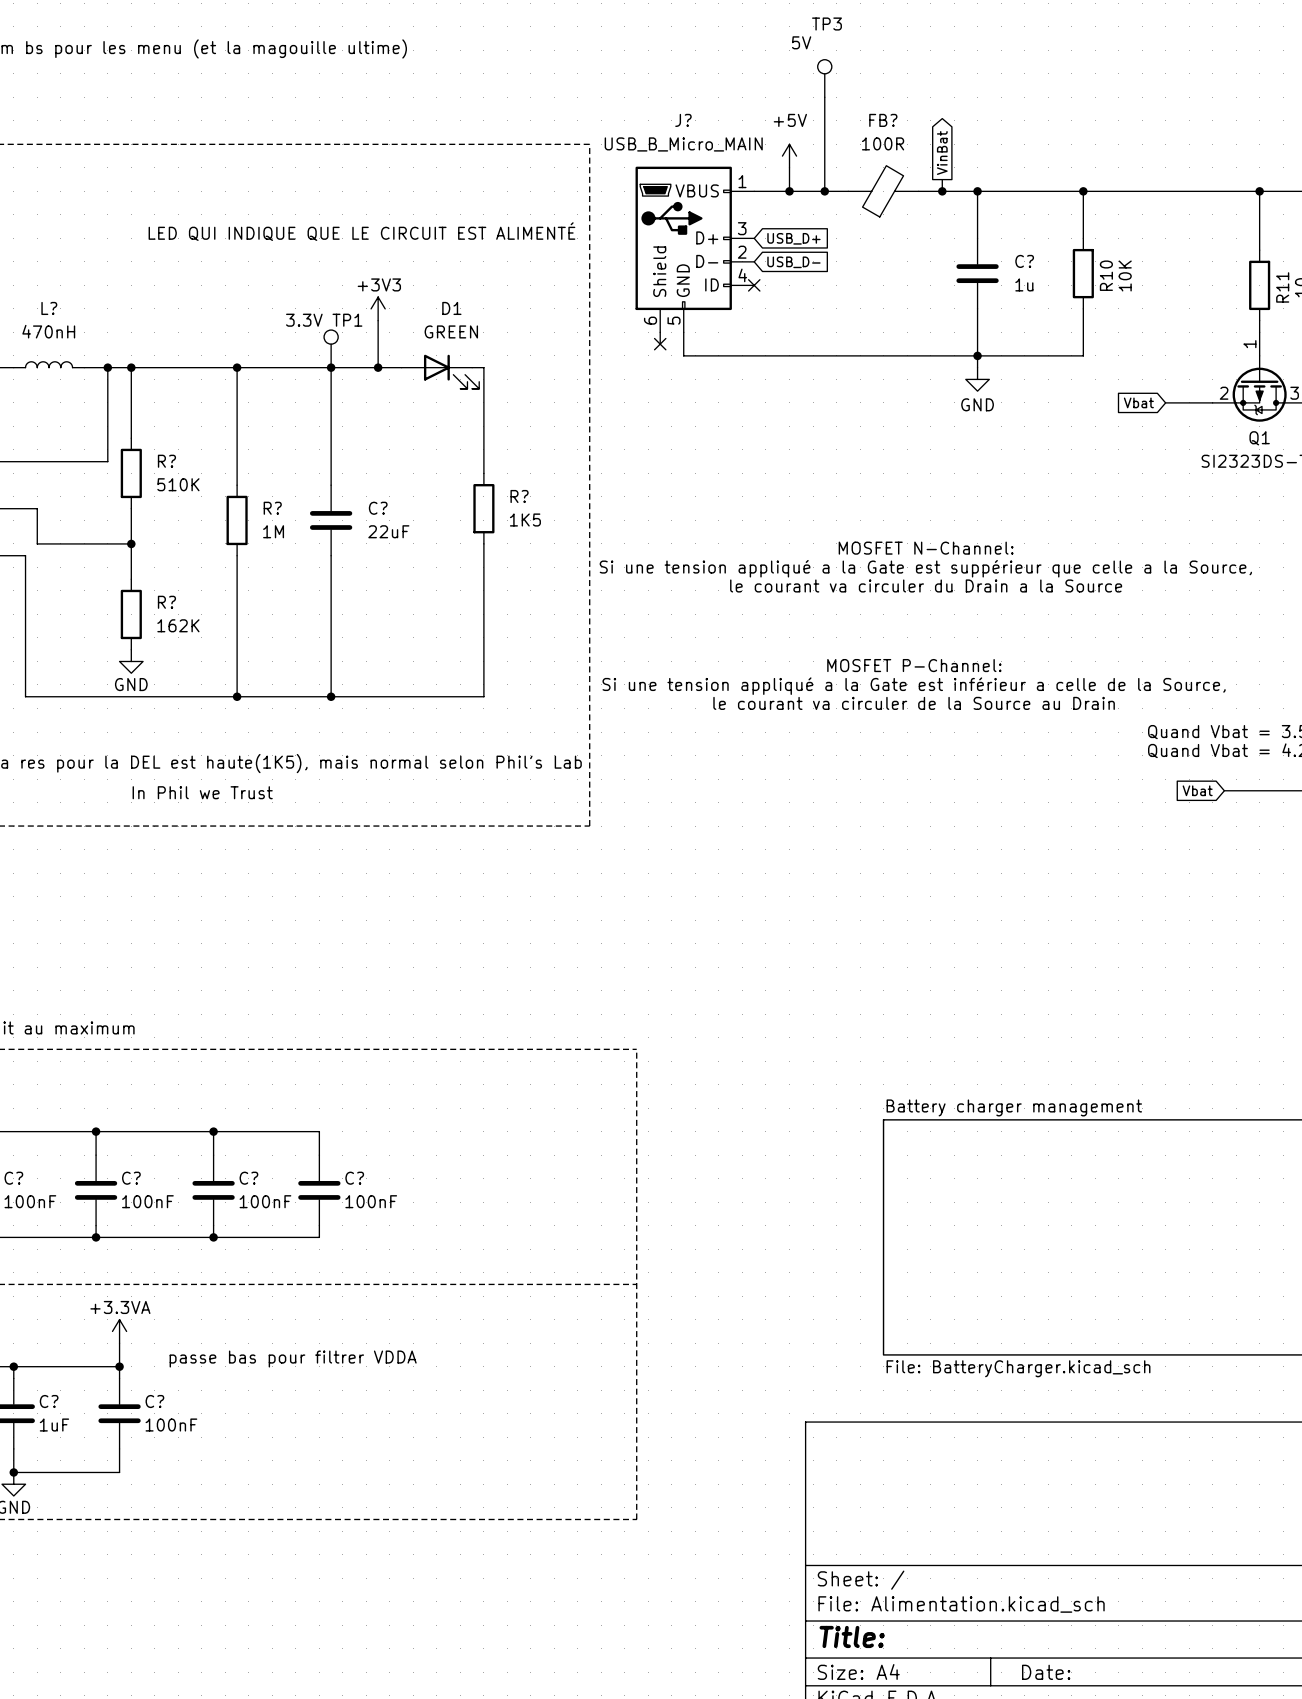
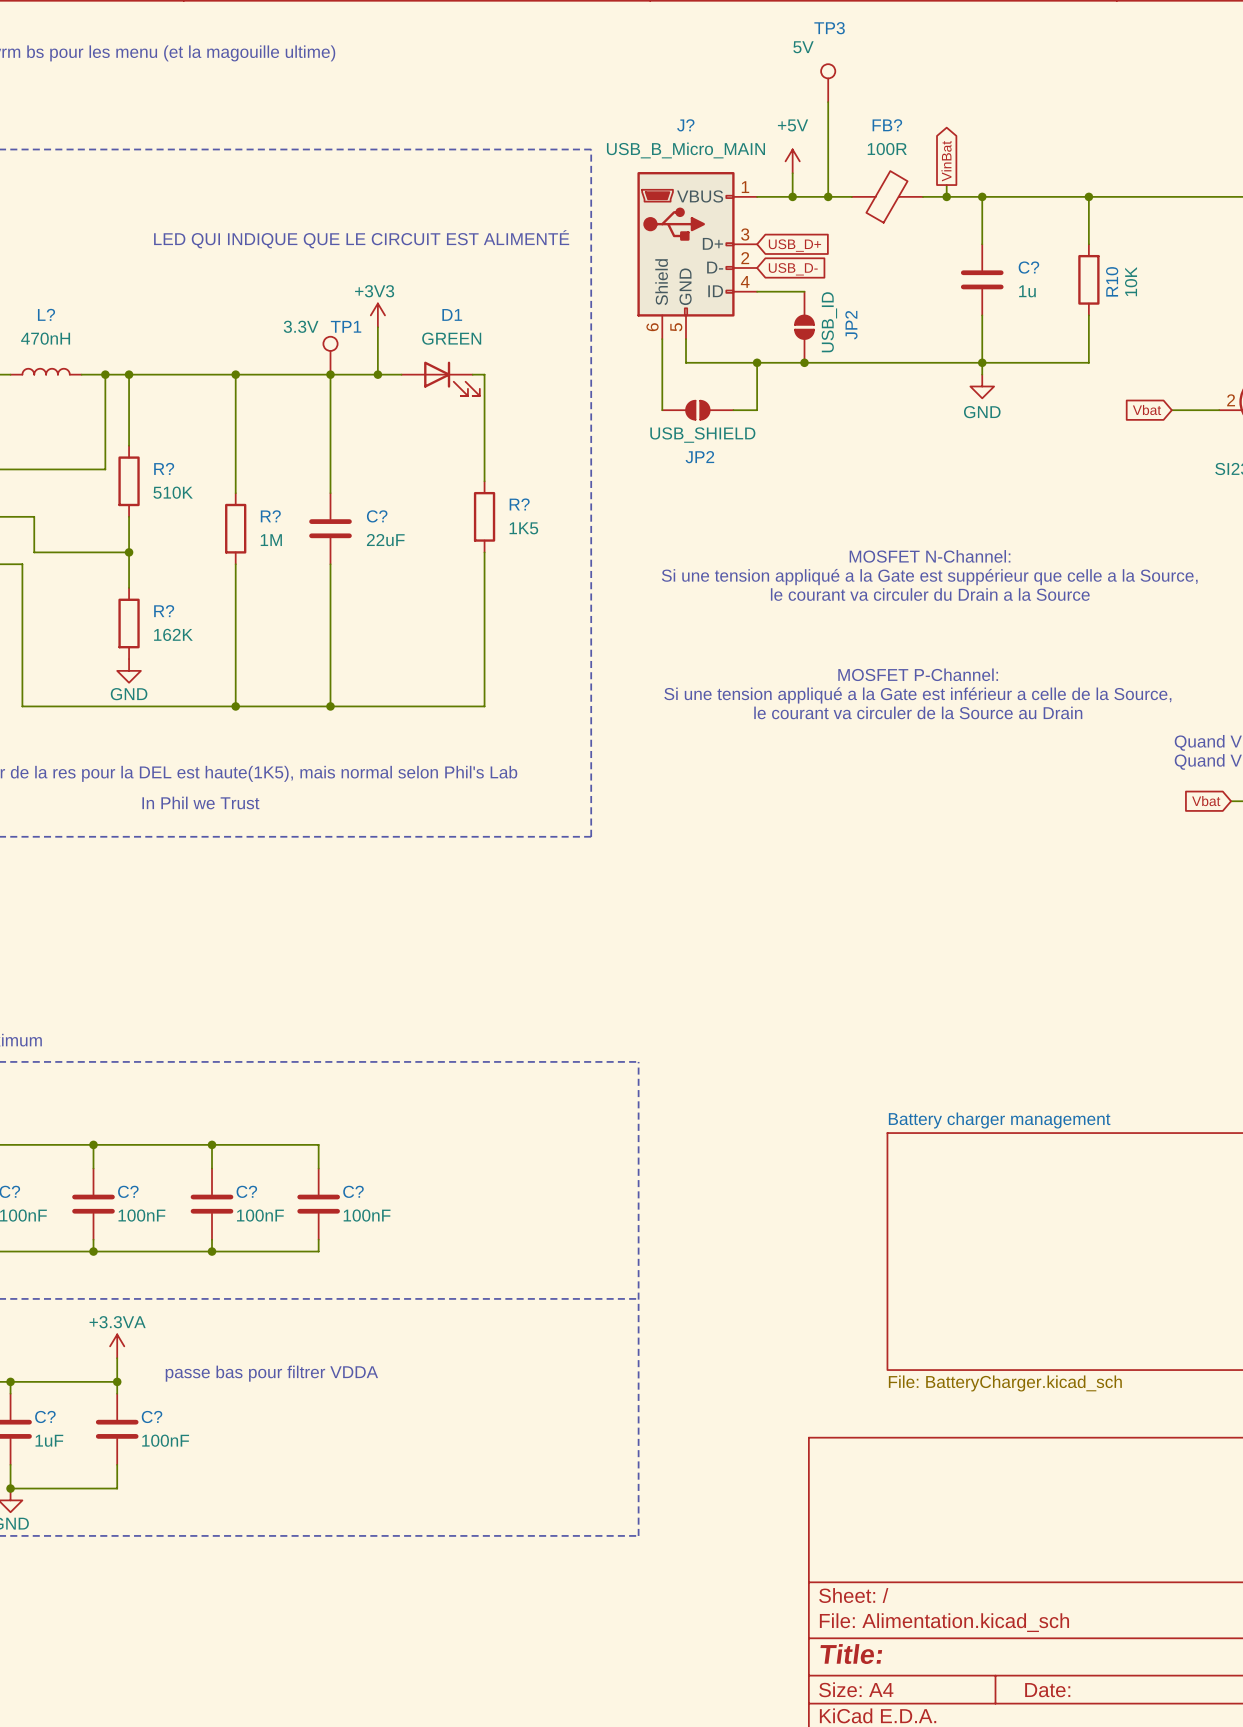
wire: none -> (757, 291) (804, 291)
no-connect mark: (754, 285) -> none
JP2: none -> USB_ID (804, 327)
wire: none -> (662, 350) (662, 410)
no-connect mark: (660, 344) -> none
wire: none -> (757, 362) (757, 410) (733, 410)
junction: none -> (757, 362)
junction: none -> (804, 362)
JP2: none -> USB_SHIELD (697, 410)

